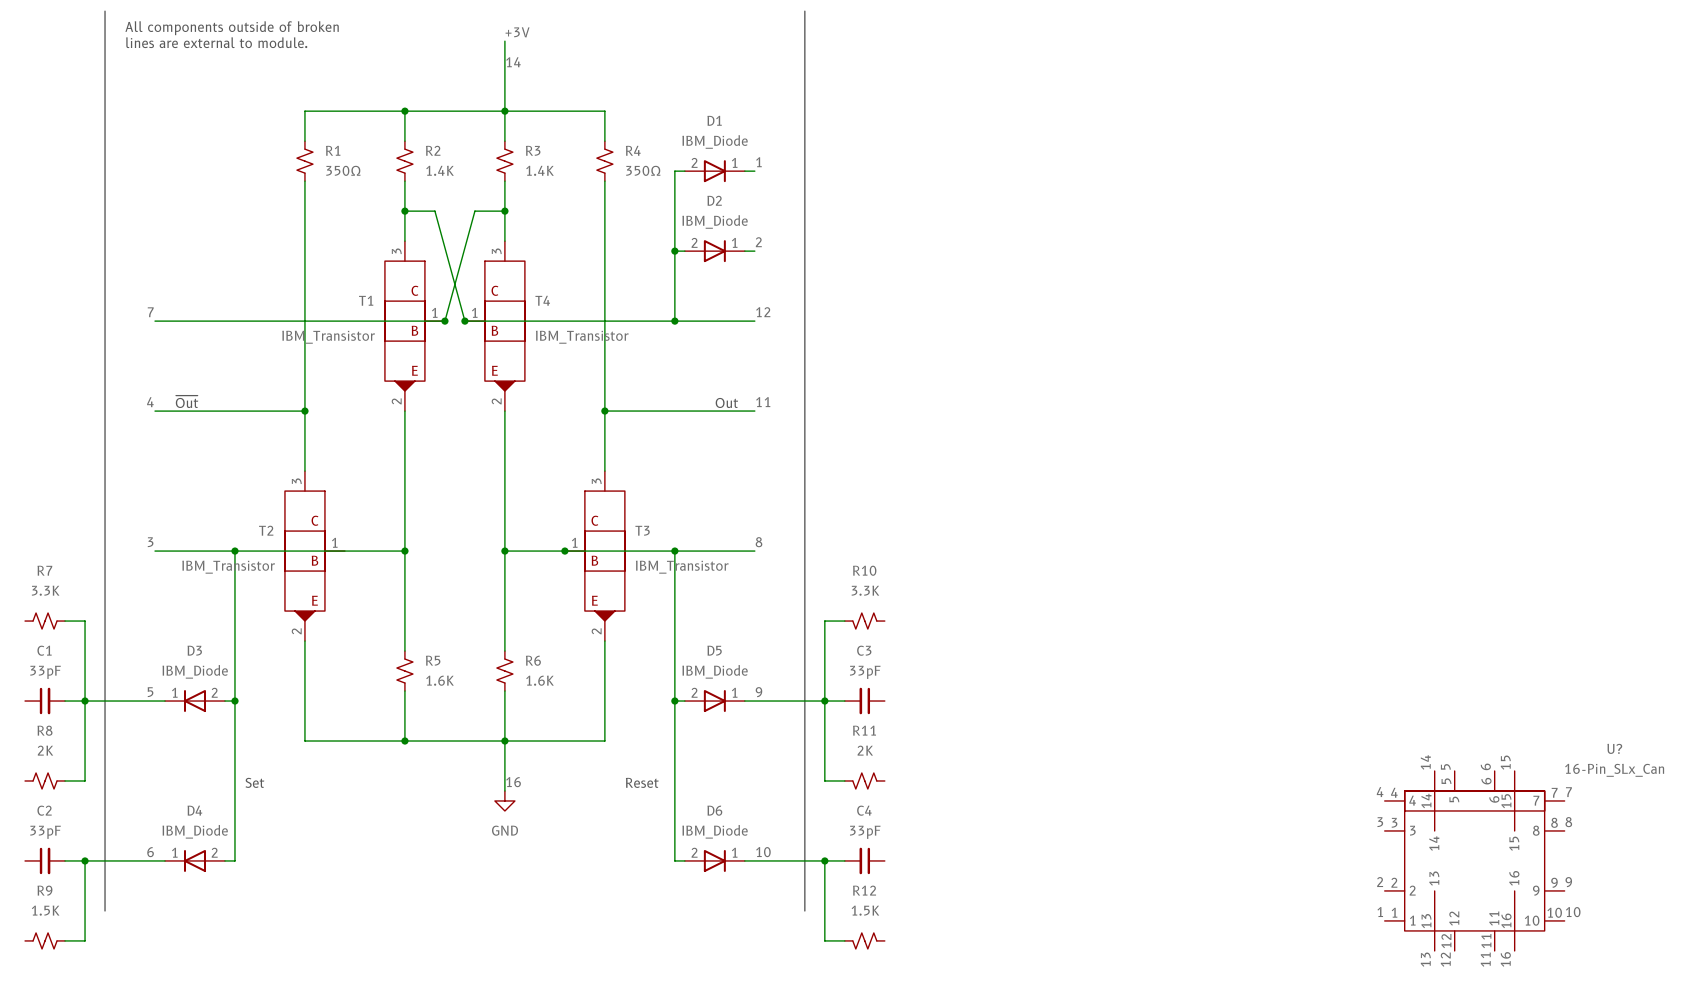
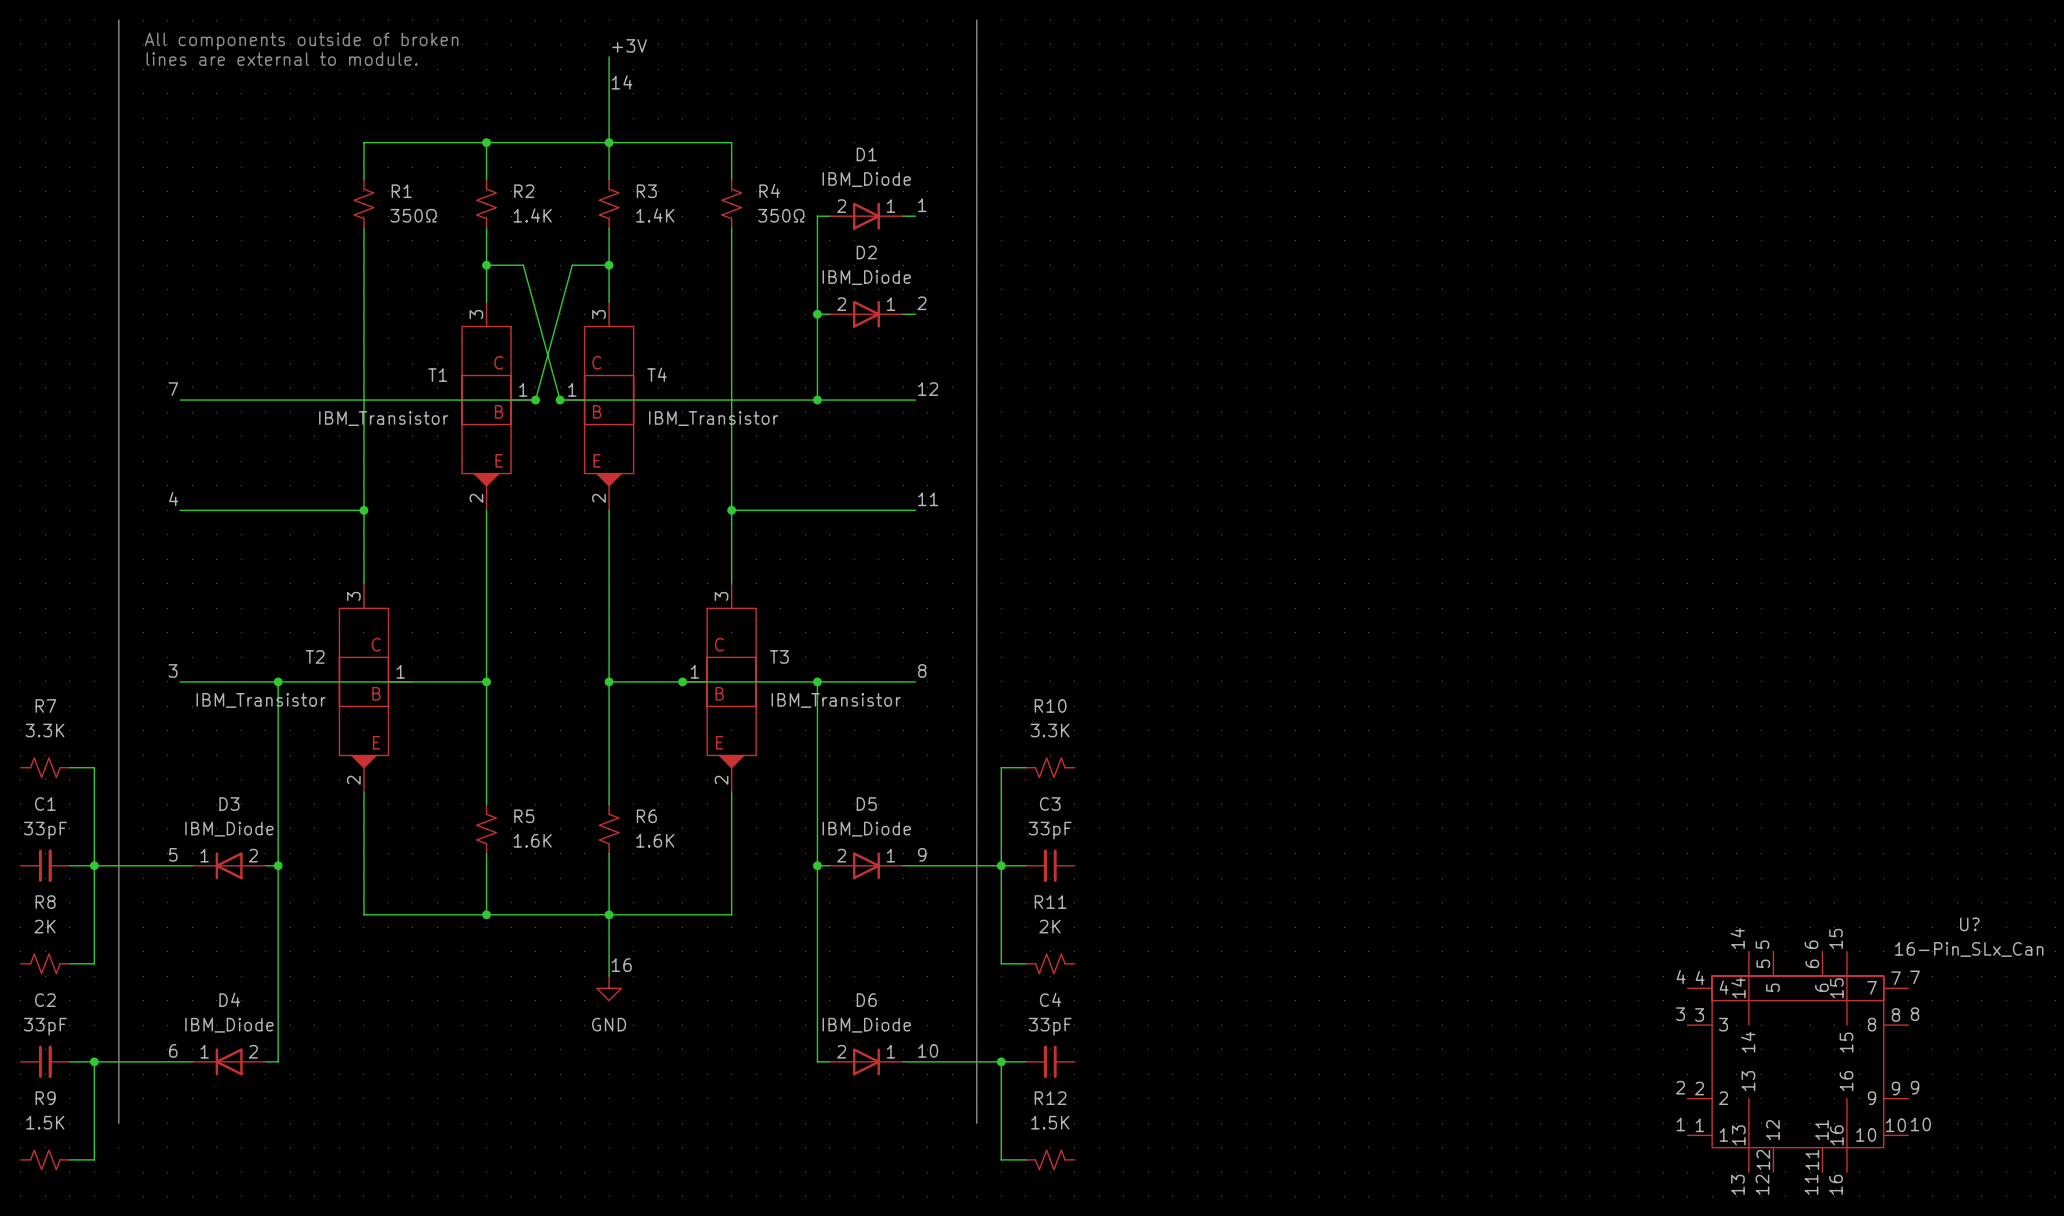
text: ~{Out} (187, 401) -> none
text: Out (726, 402) -> none
text: Set (254, 782) -> none
text: Reset (642, 782) -> none

